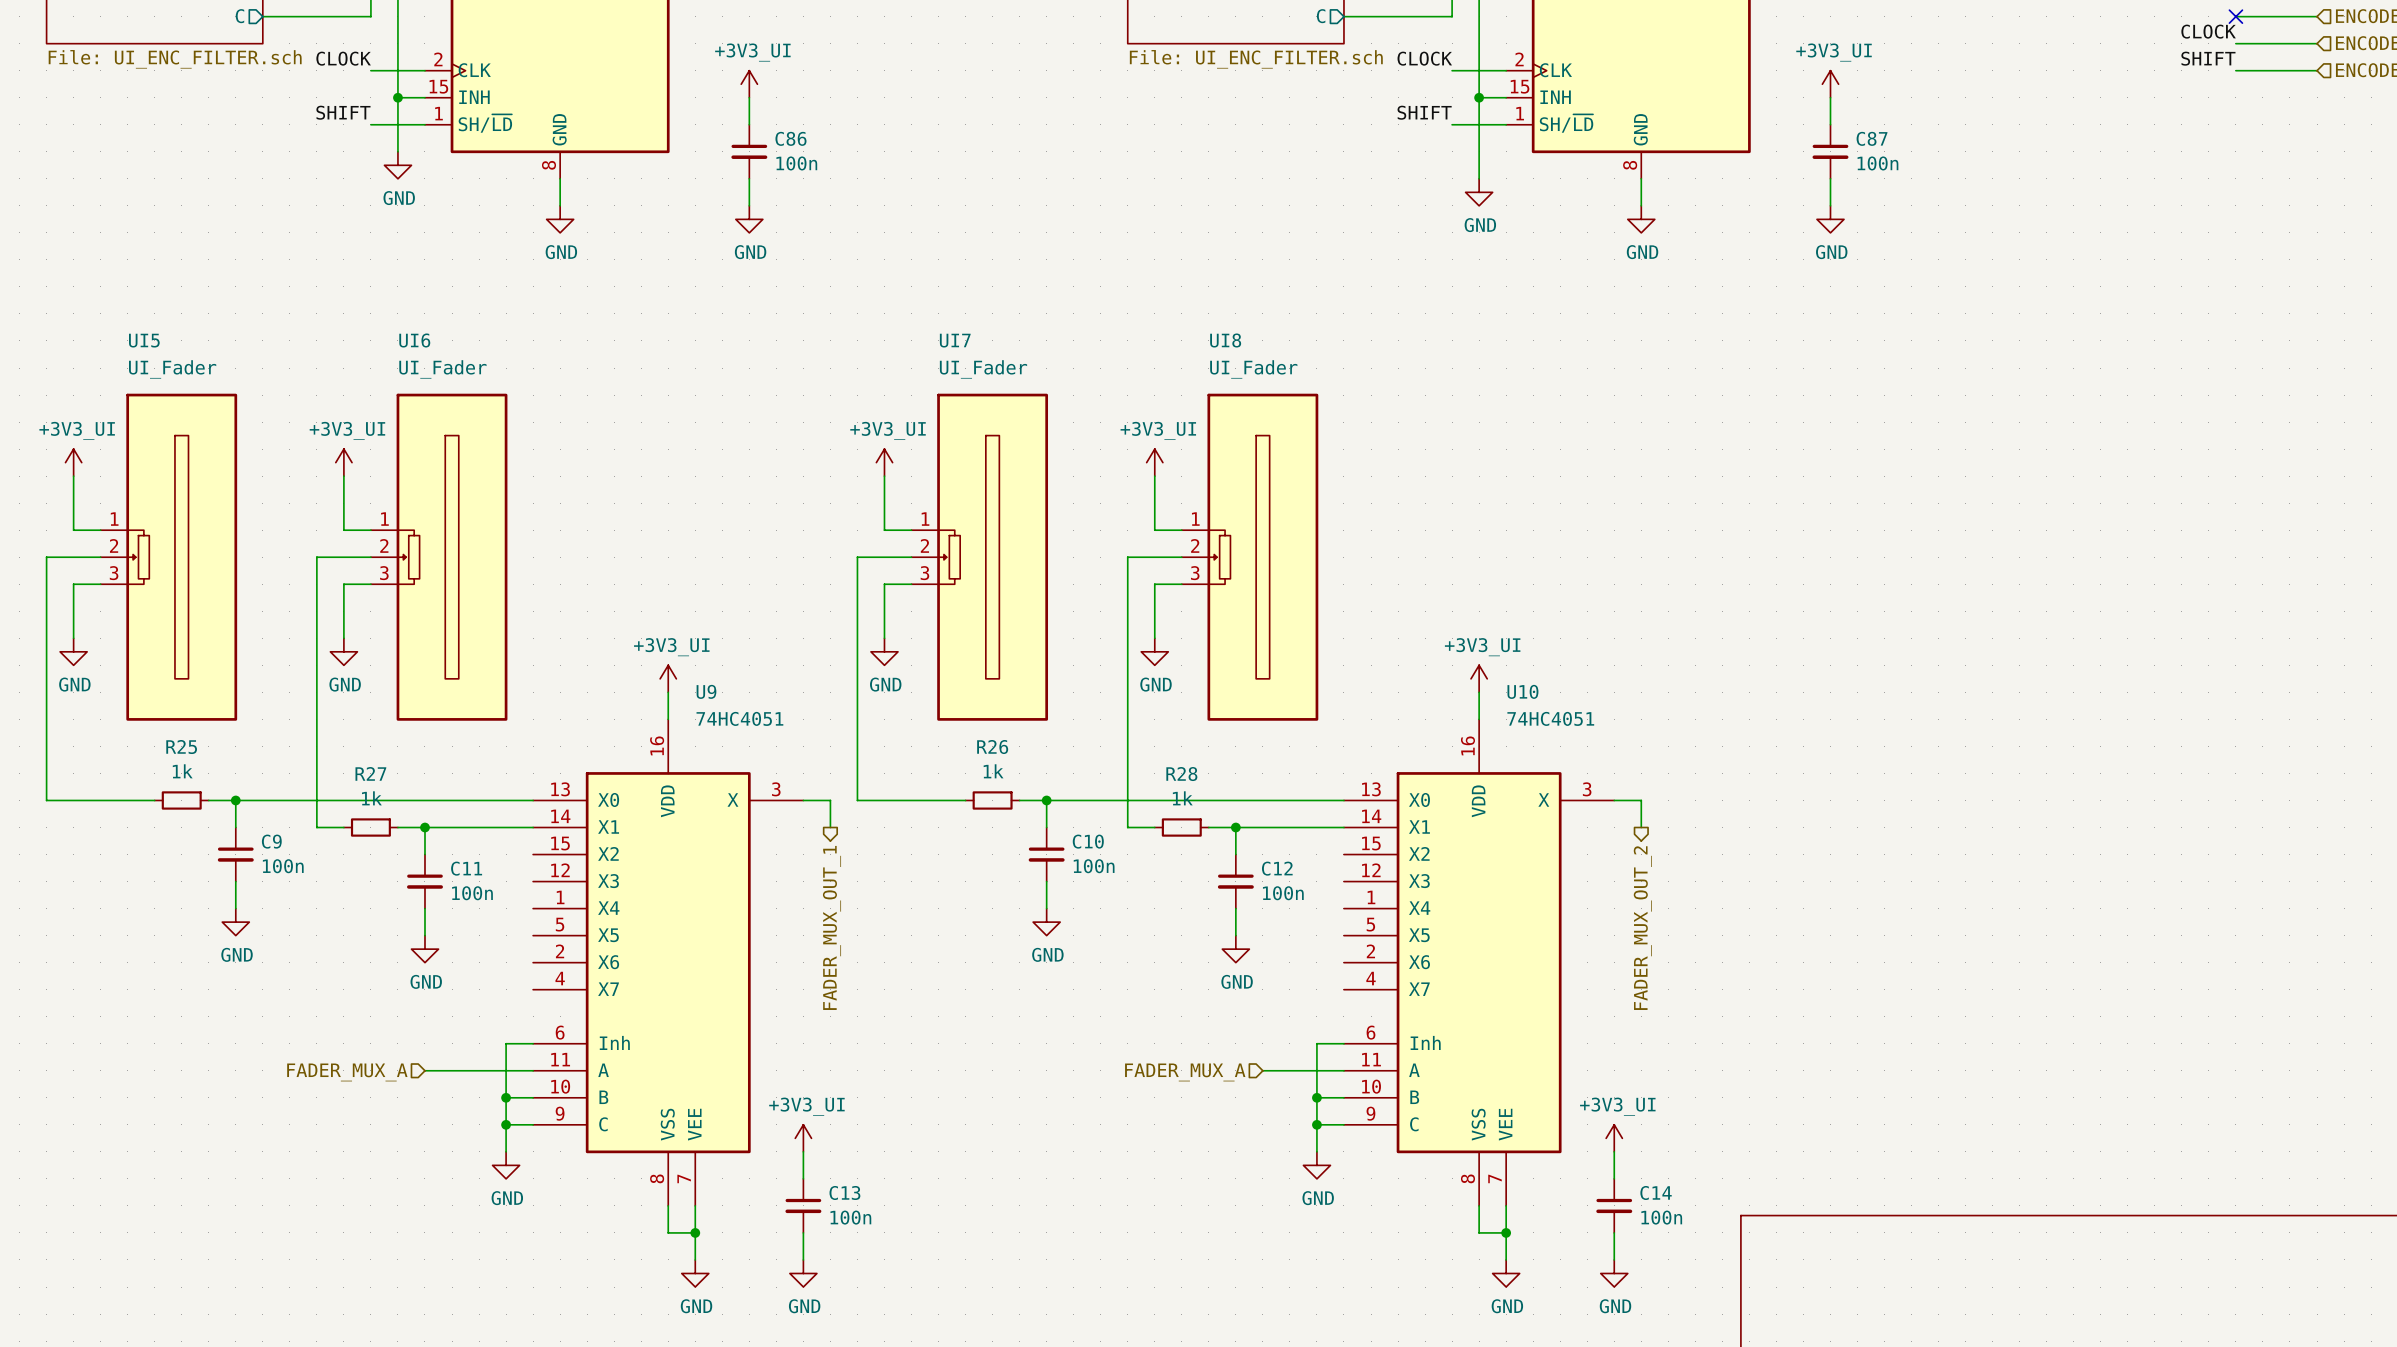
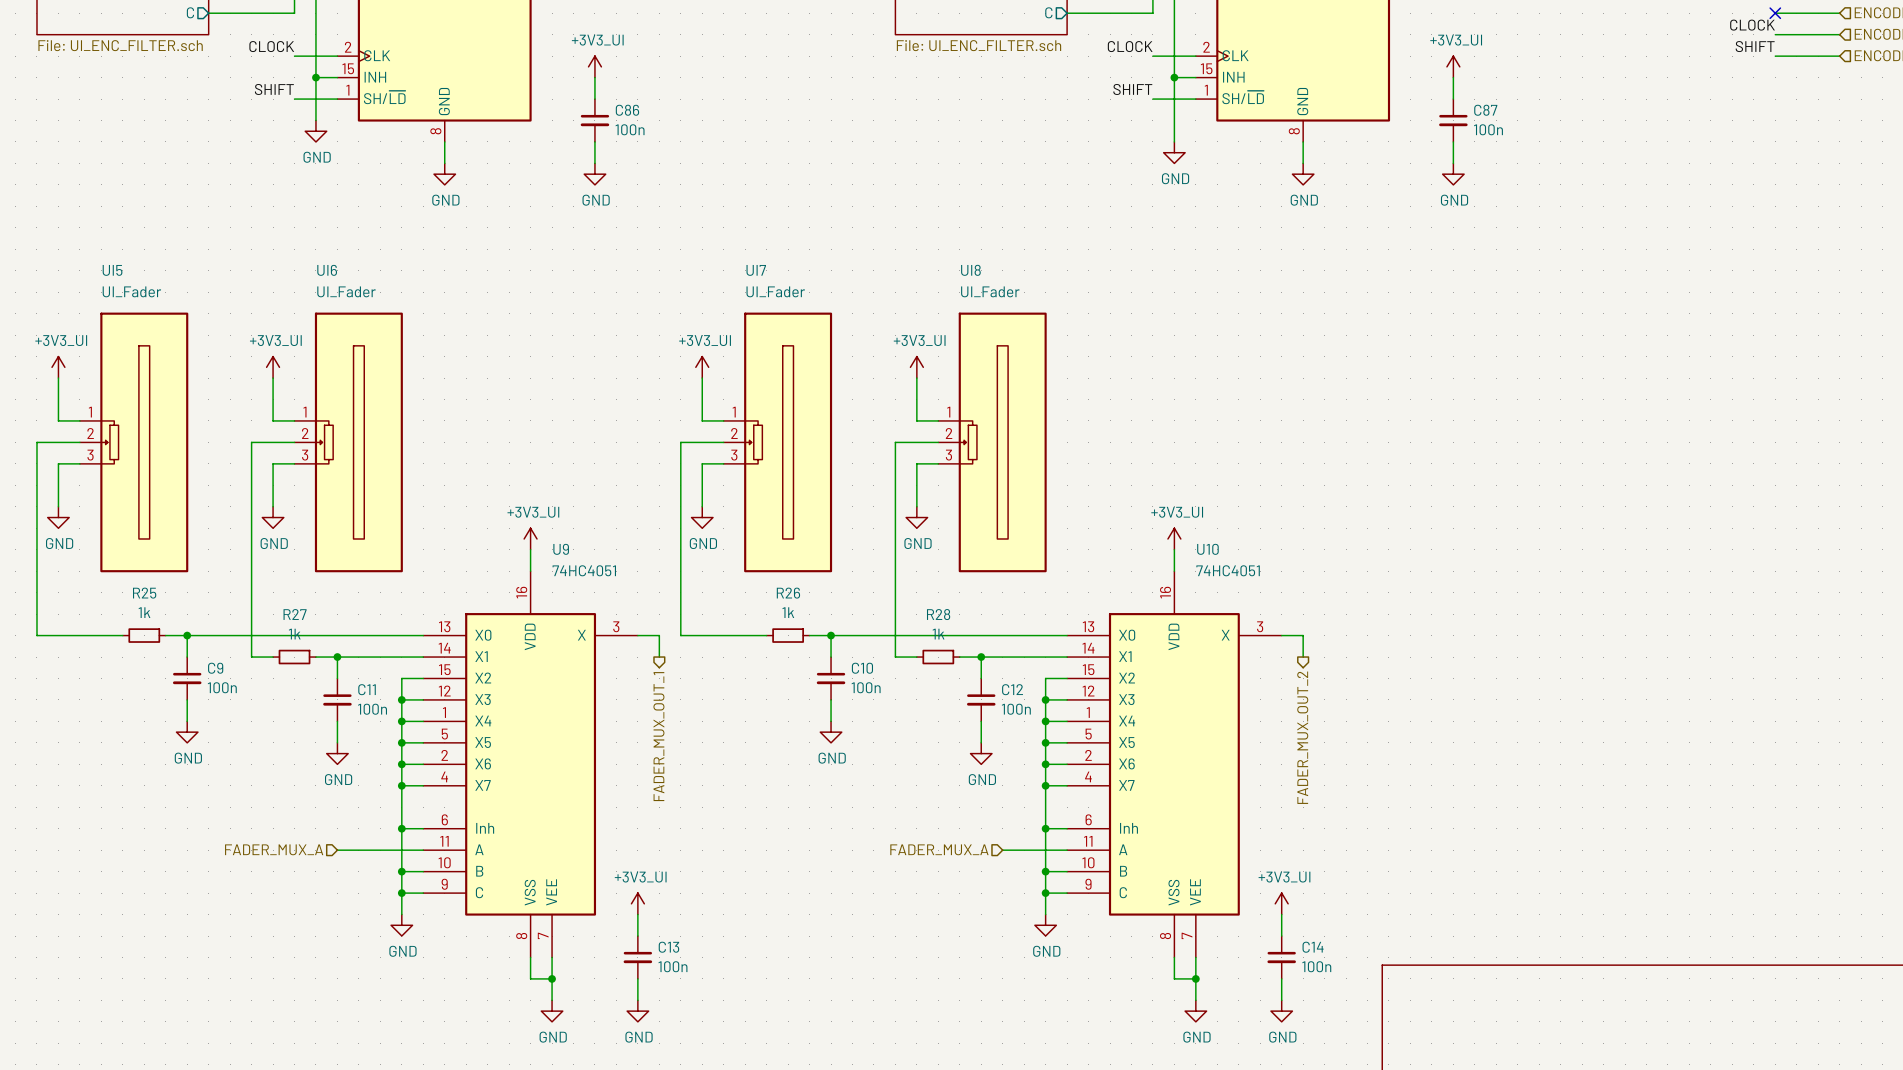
wire: none -> (423, 678) (401, 678) (401, 828)
wire: none -> (1067, 678) (1045, 678) (1045, 828)
wire: none -> (401, 699) (423, 699)
junction: none -> (401, 699)
wire: none -> (1045, 699) (1067, 699)
junction: none -> (1045, 699)
wire: none -> (401, 721) (423, 721)
junction: none -> (401, 721)
wire: none -> (1045, 721) (1067, 721)
junction: none -> (1045, 721)
wire: none -> (401, 742) (423, 742)
junction: none -> (401, 742)
wire: none -> (1045, 742) (1067, 742)
junction: none -> (1045, 742)
wire: none -> (401, 764) (423, 764)
junction: none -> (401, 764)
wire: none -> (1045, 764) (1067, 764)
junction: none -> (1045, 764)
wire: none -> (401, 785) (423, 785)
junction: none -> (401, 785)
wire: none -> (1045, 785) (1067, 785)
junction: none -> (1045, 785)
junction: none -> (401, 828)
junction: none -> (1045, 828)

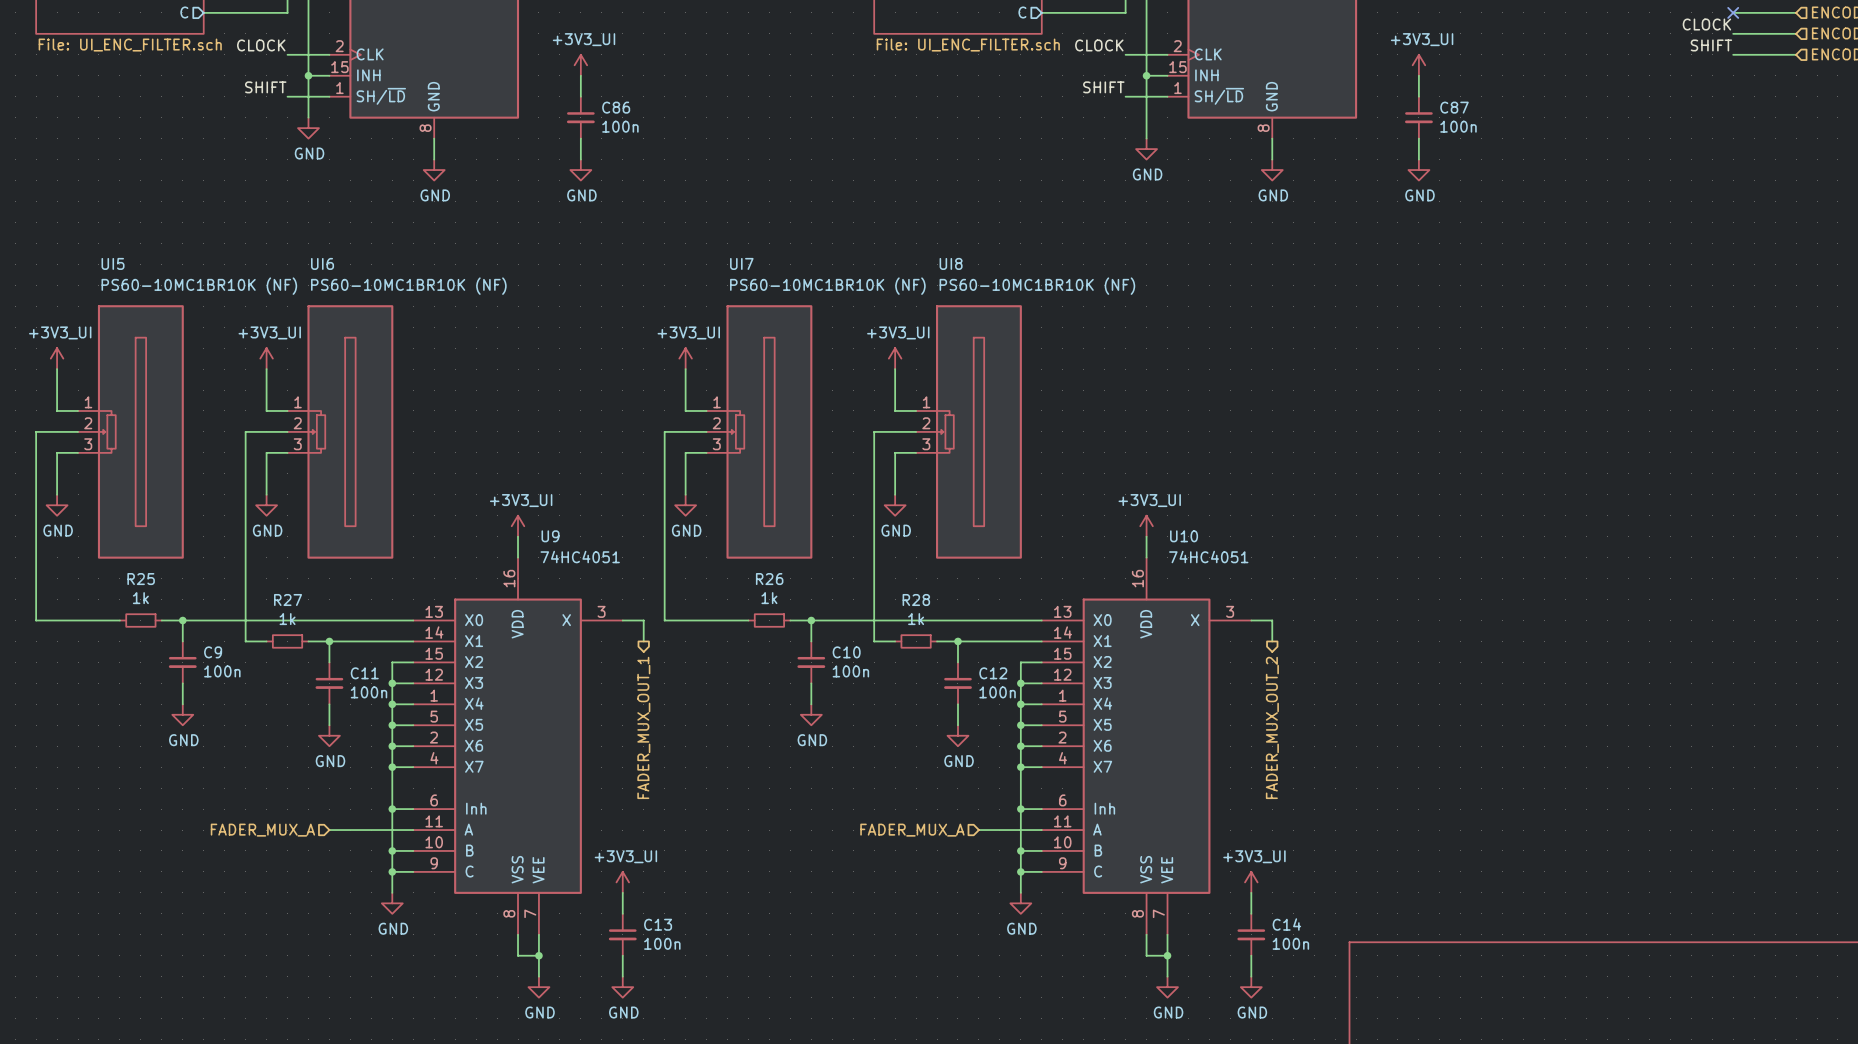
UI5 value: UI_Fader (131, 291) -> PS60-10MC1BR10K (NF) (199, 286)
UI6 value: UI_Fader (346, 291) -> PS60-10MC1BR10K (NF) (408, 286)
UI7 value: UI_Fader (775, 291) -> PS60-10MC1BR10K (NF) (827, 286)
UI8 value: UI_Fader (990, 291) -> PS60-10MC1BR10K (NF) (1037, 286)

